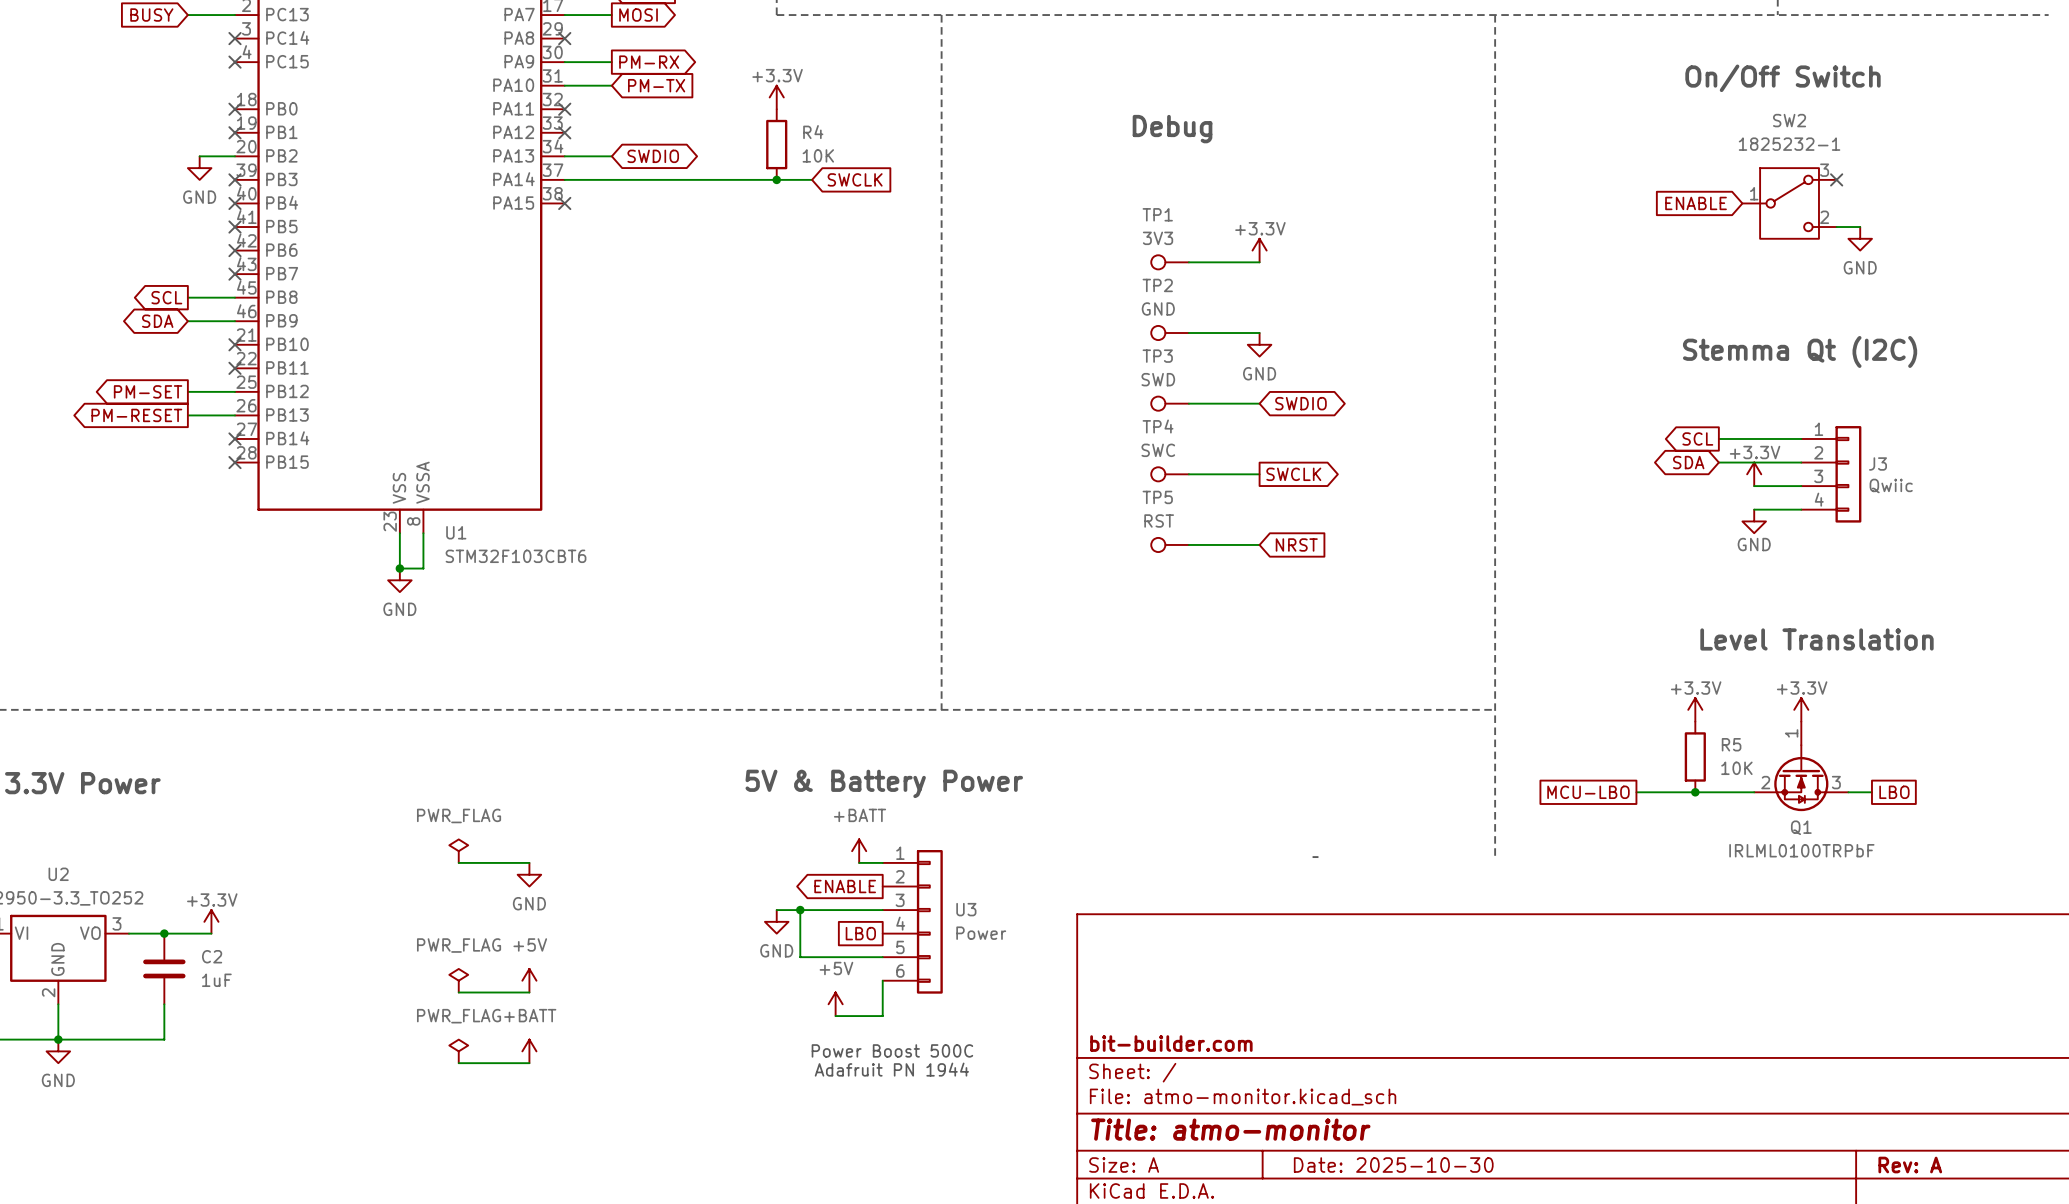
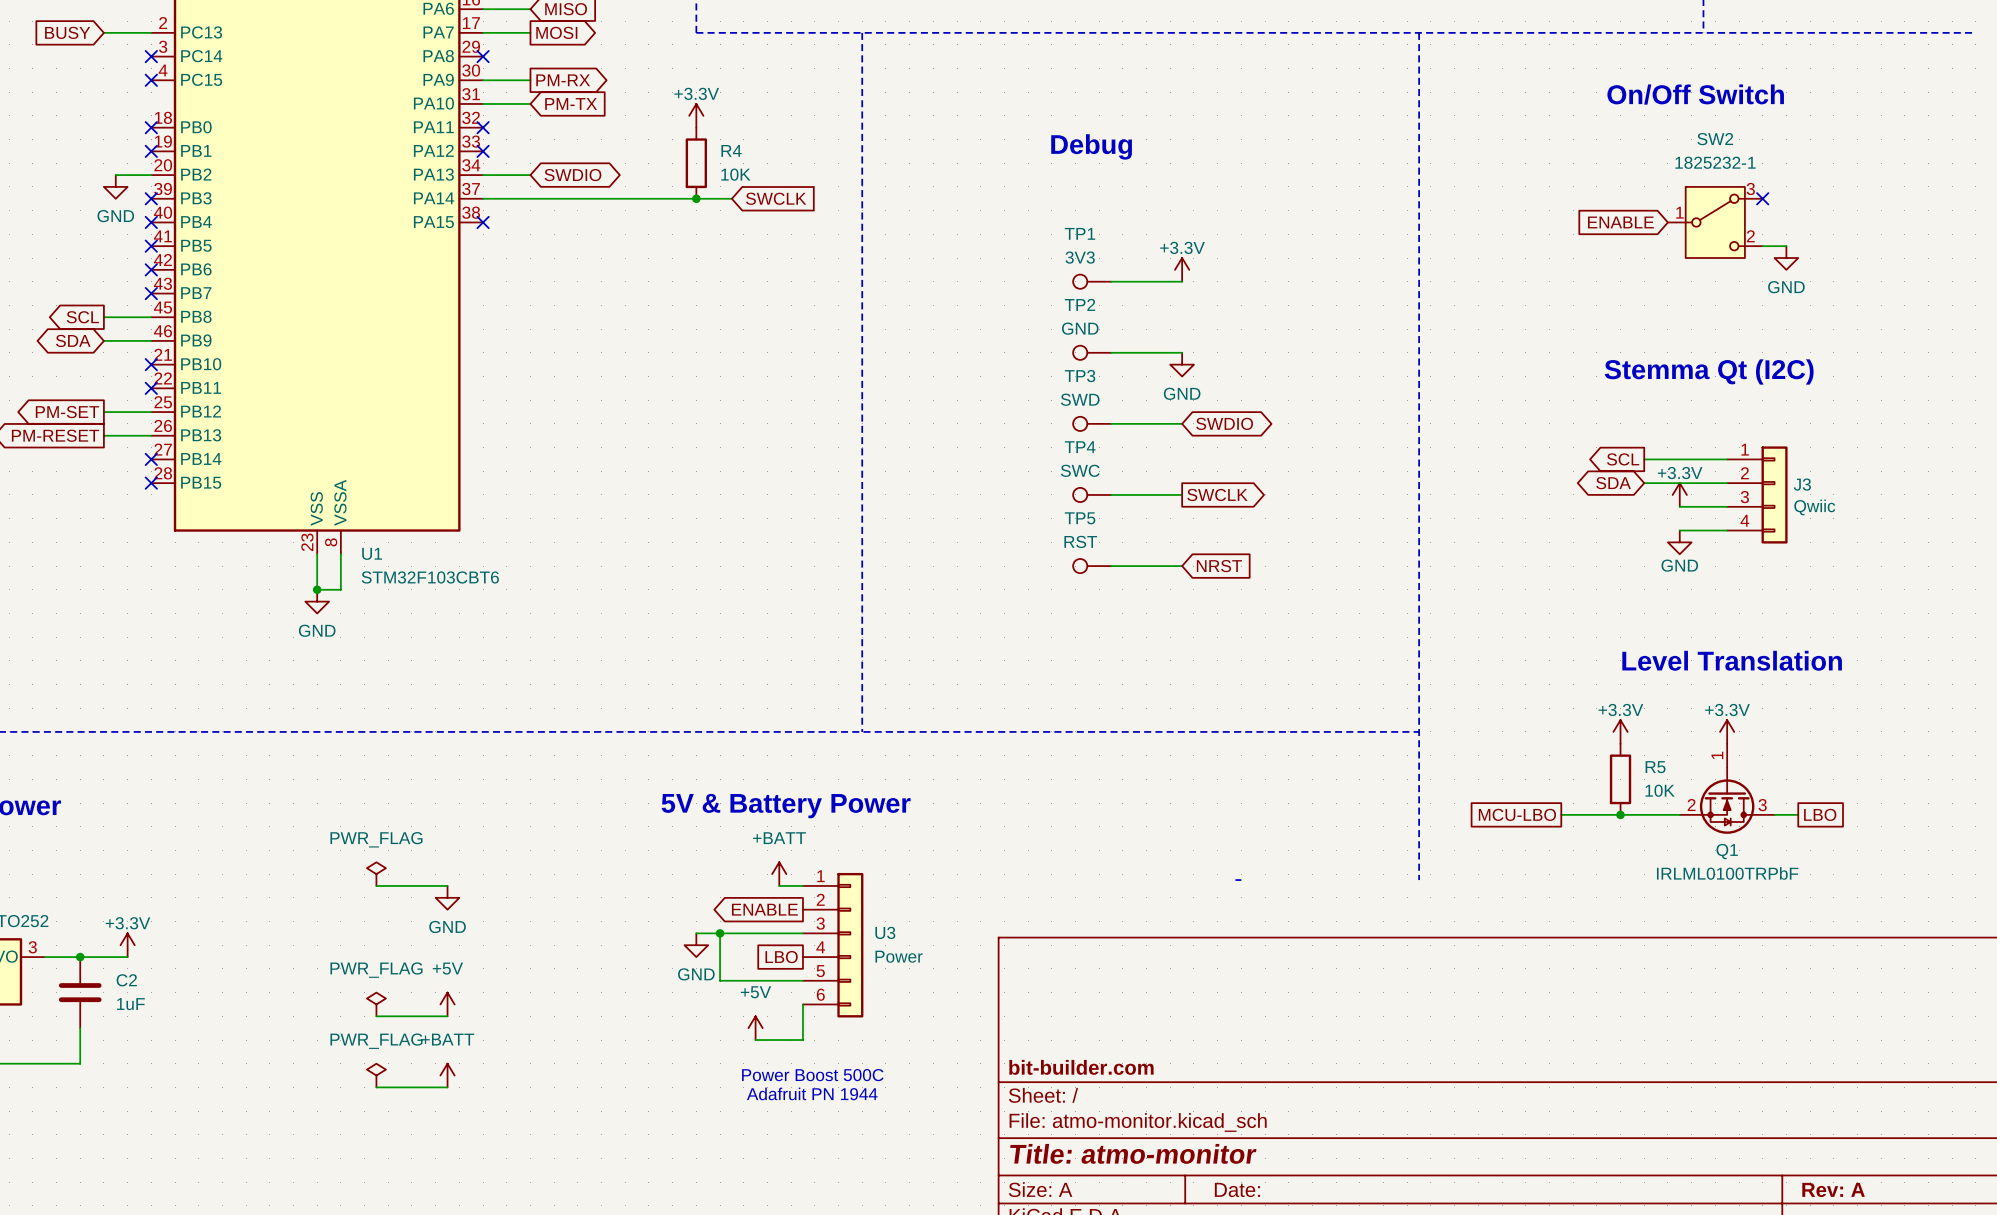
title block: Date: 2025-10-30 (1393, 1165) -> Date: (1237, 1189)

